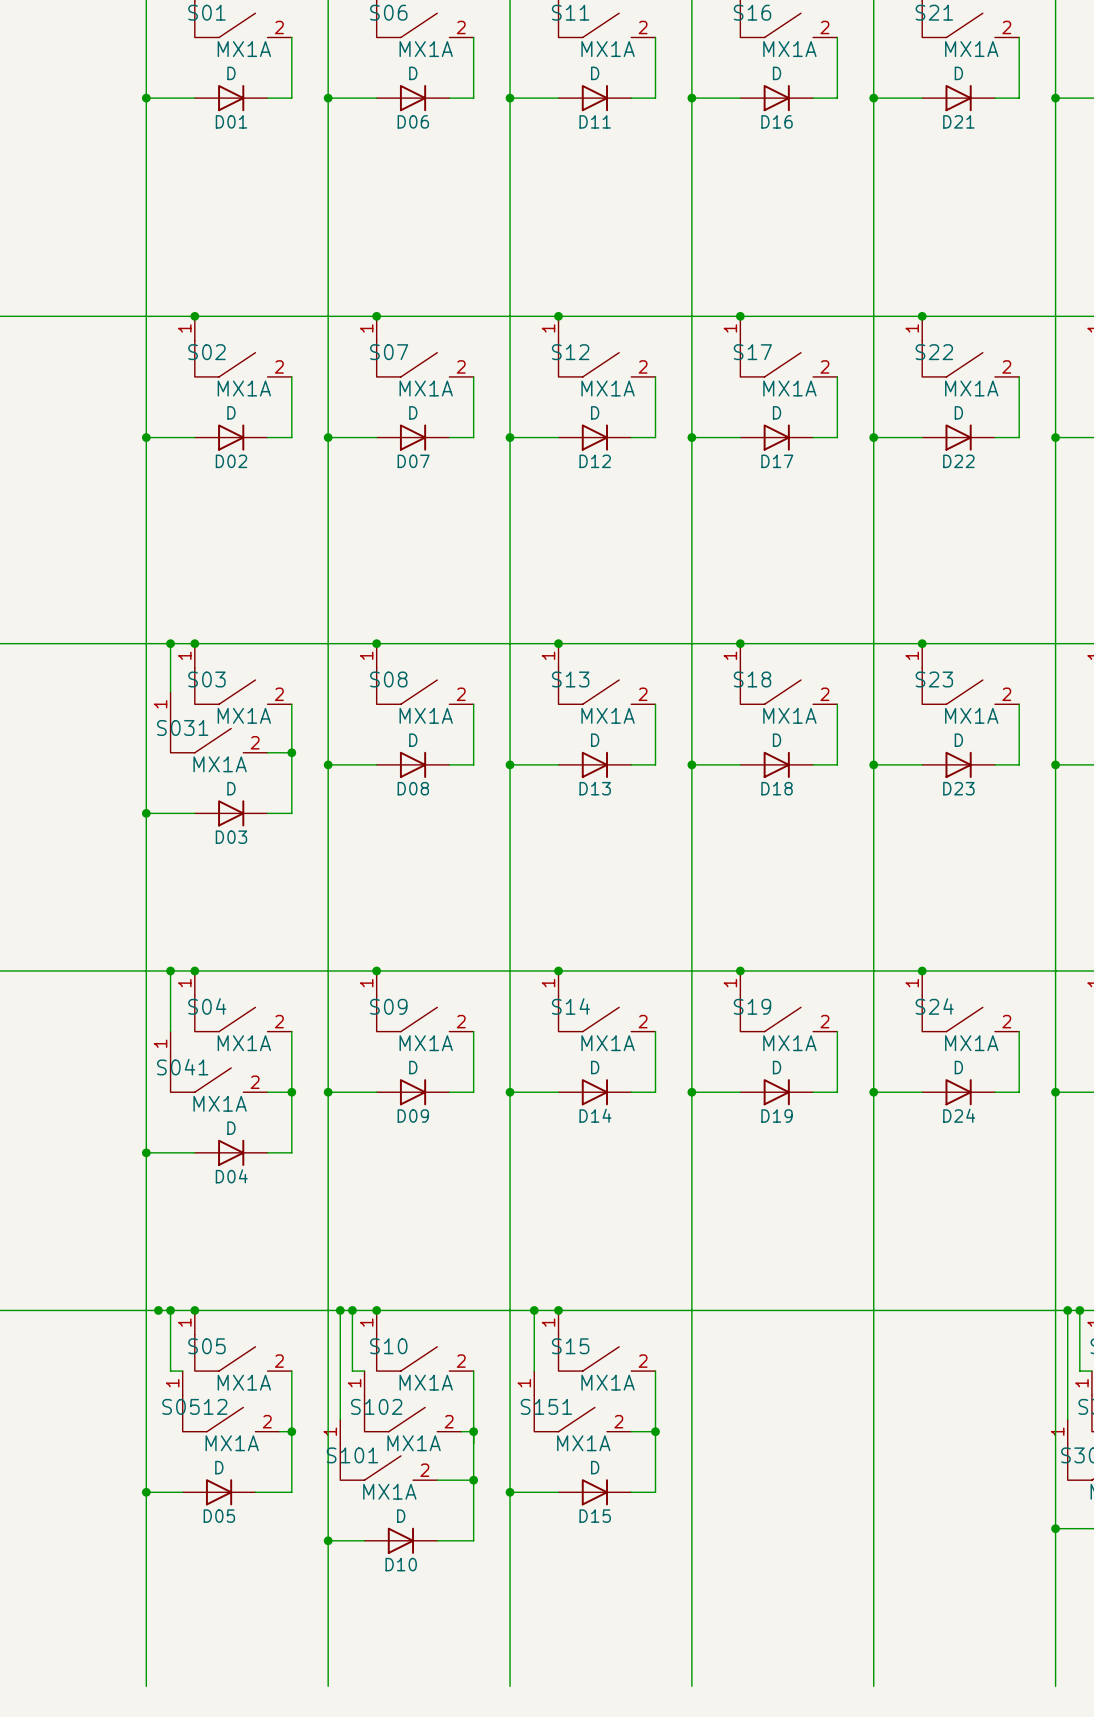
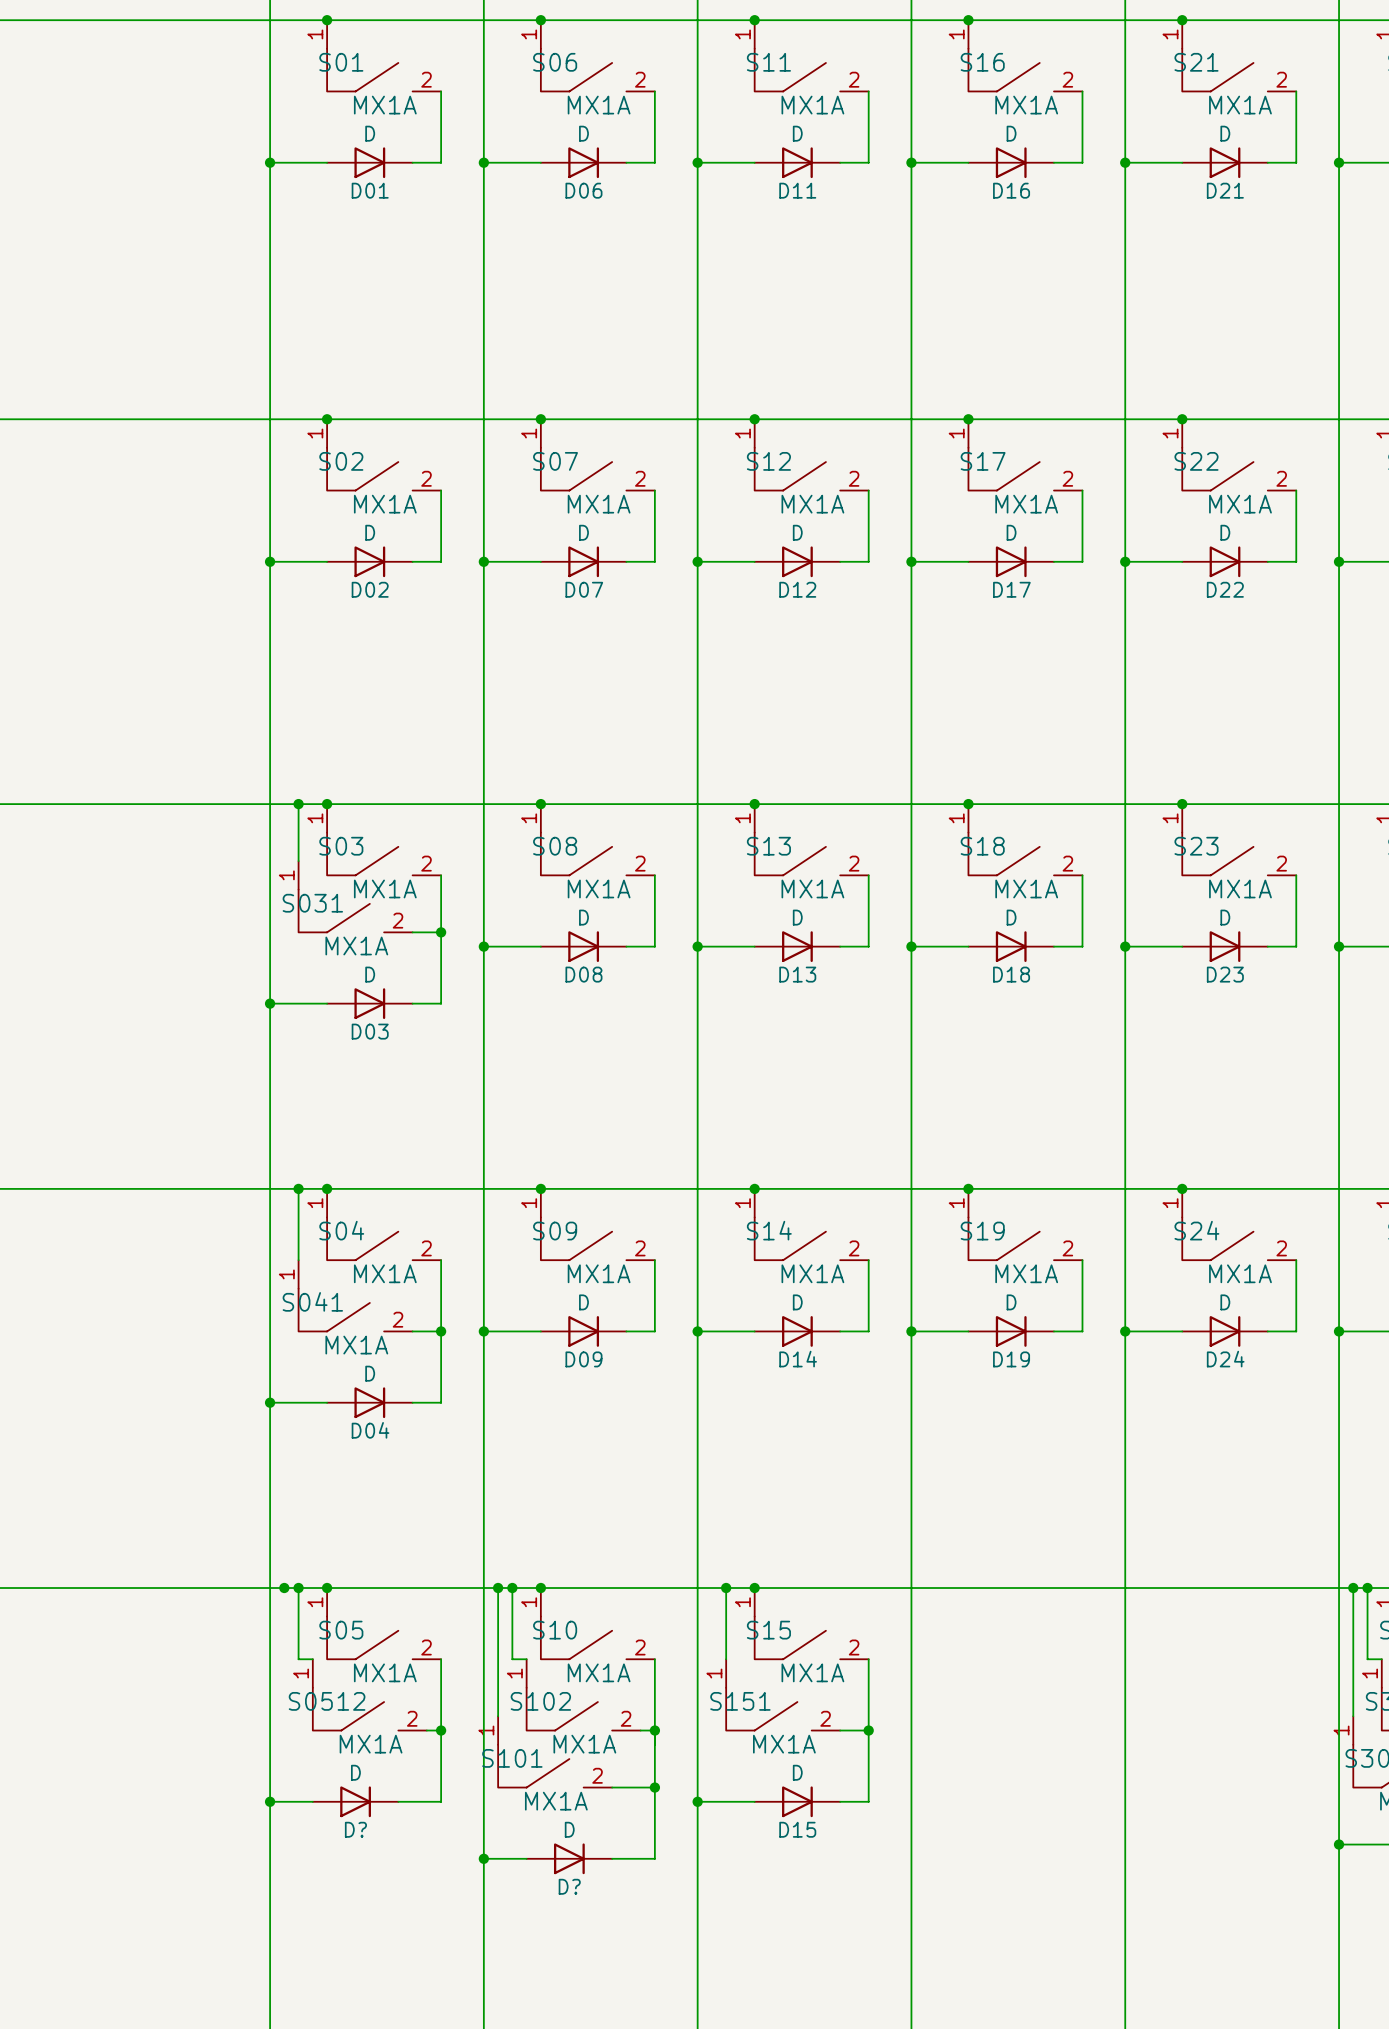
D05 name: D05 (219, 1516) -> D? (355, 1829)
D10 name: D10 (401, 1564) -> D? (569, 1886)

